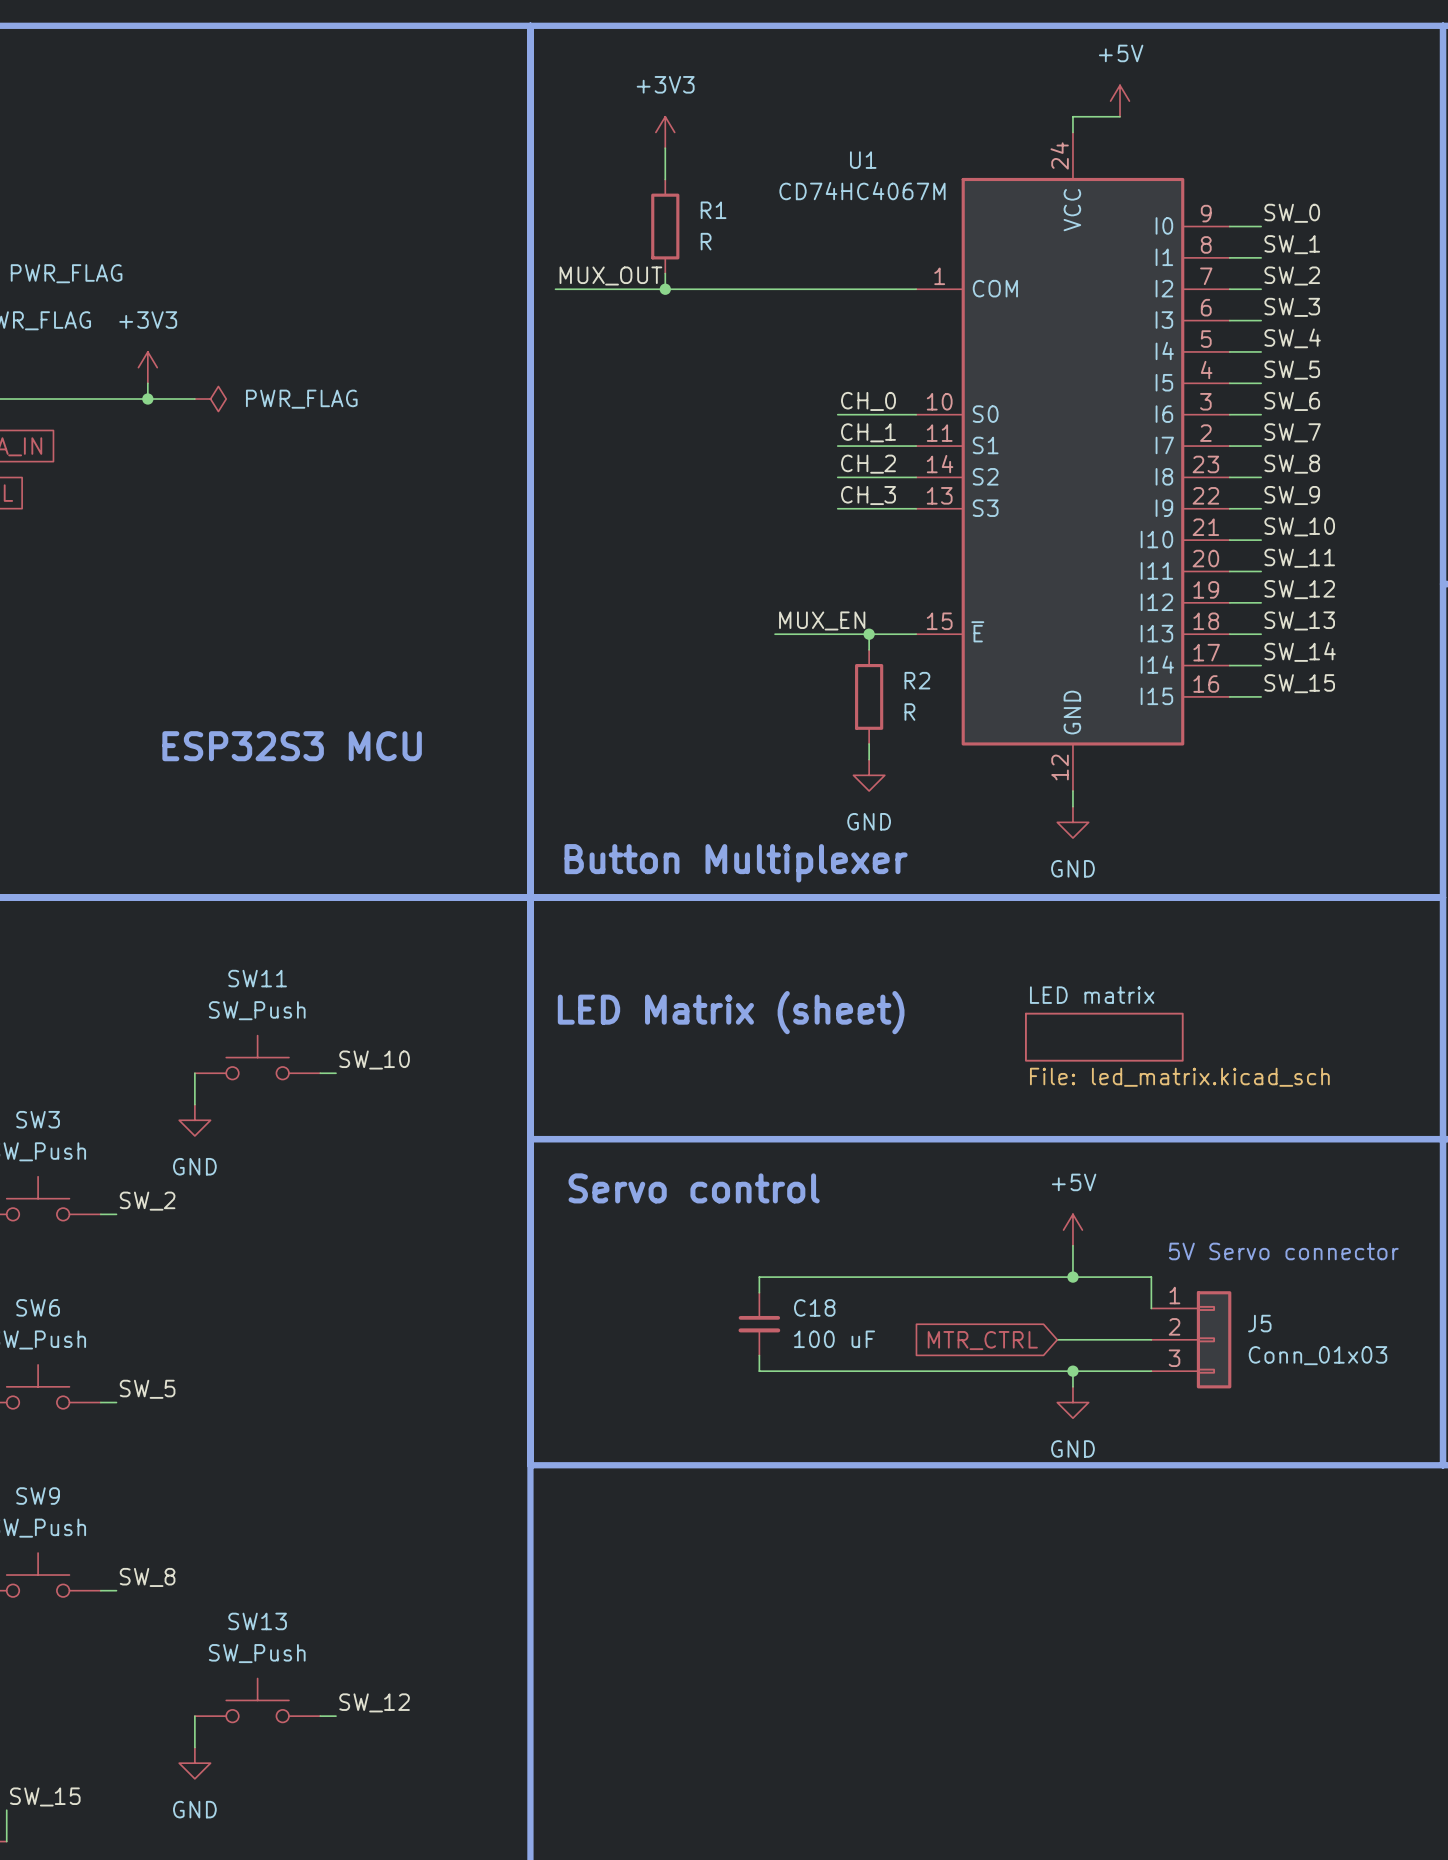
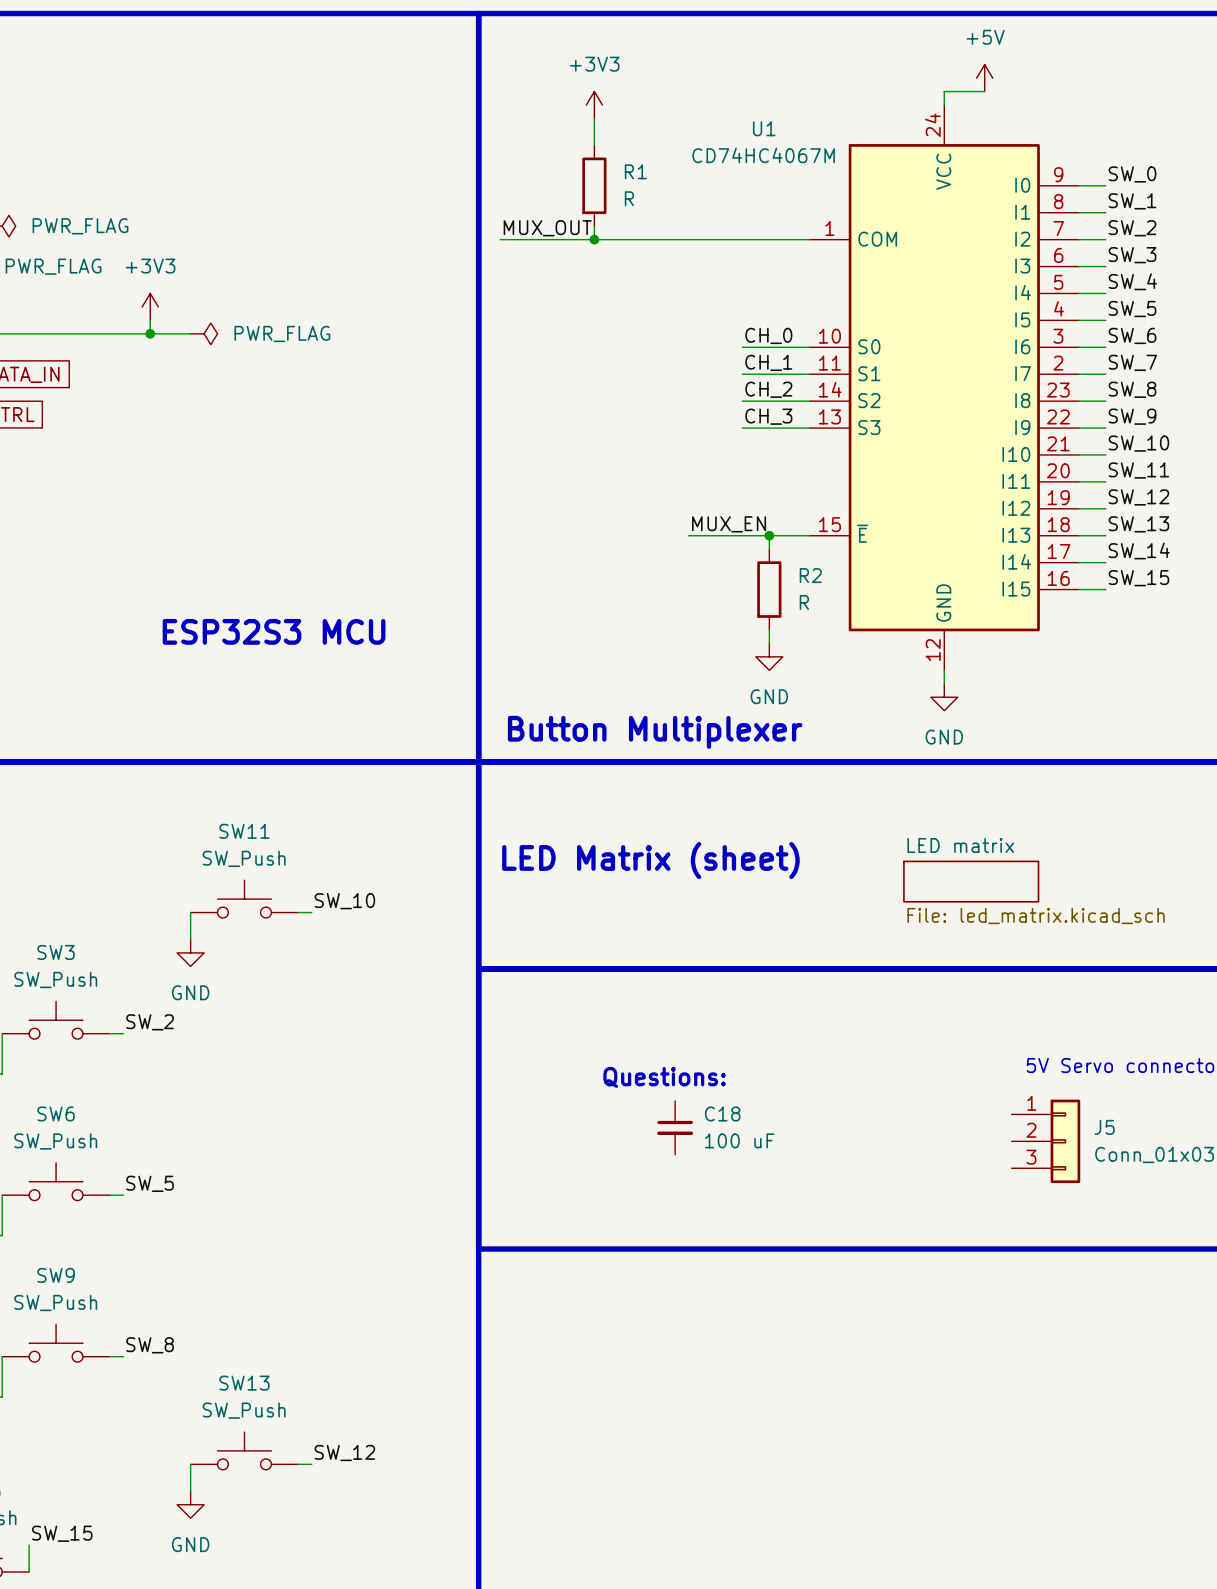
text: Servo control (694, 1188) -> none
power symbol: +5V (1072, 1230) -> none
wire: (1072, 1245) (1072, 1277) -> none
text: none -> Questions: (664, 1077)
junction: (1072, 1277) -> none
wire: (759, 1292) (759, 1277) (1151, 1277) (1151, 1308) -> none
wire: (1057, 1339) (1151, 1339) -> none
global label: MTR_CTRL (982, 1340) -> none
wire: (759, 1355) (759, 1371) (1151, 1371) -> none
wire: (1072, 1371) (1072, 1386) -> none
junction: (1072, 1371) -> none
power symbol: GND (1072, 1402) -> none

